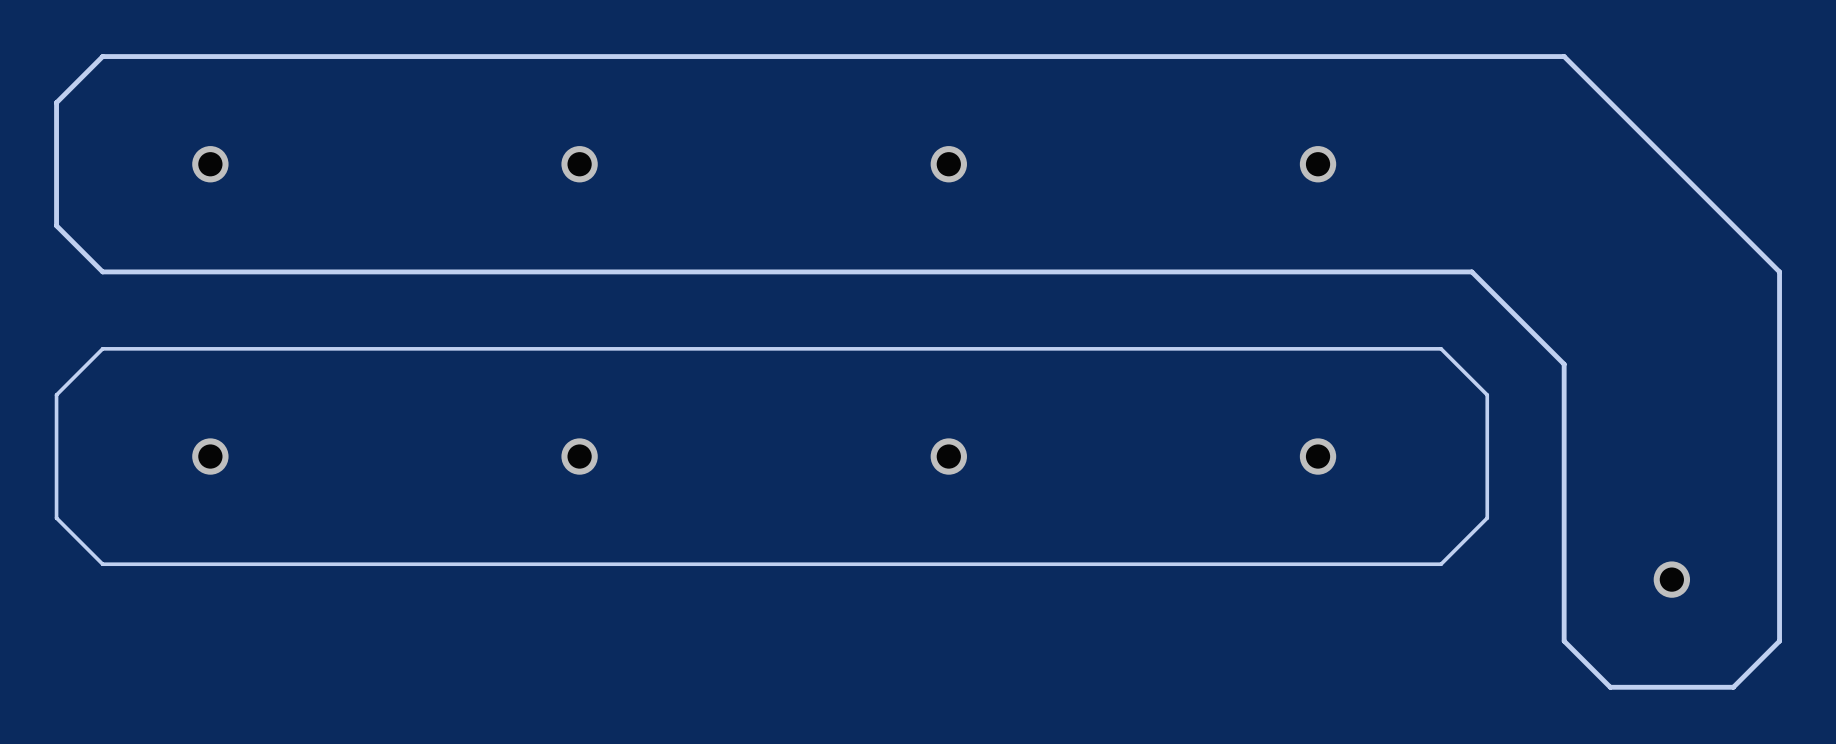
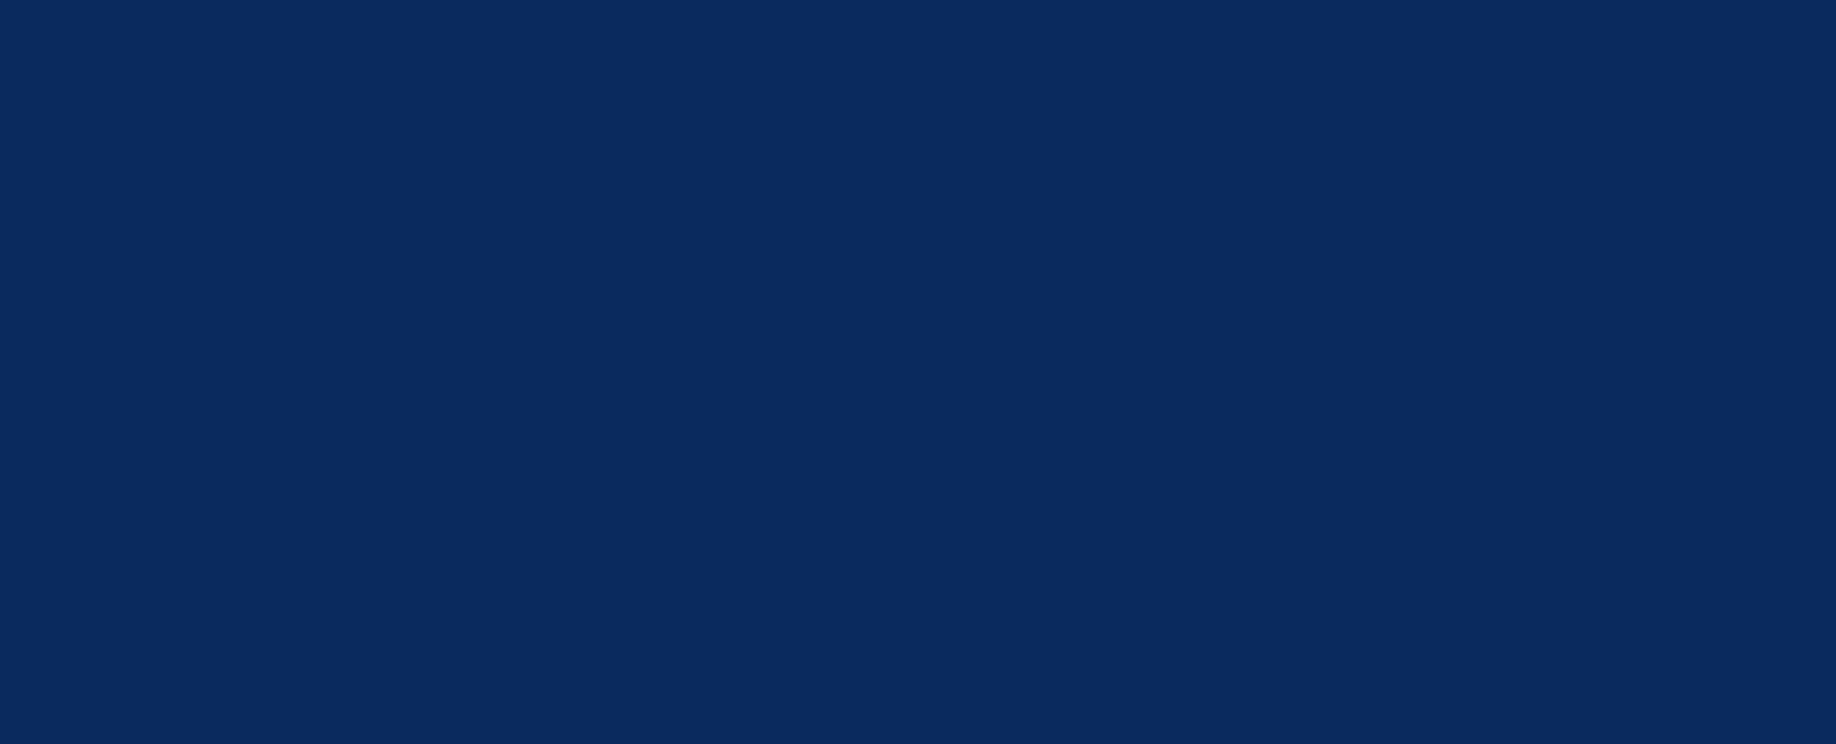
board edge: (102, 56) (56, 102) (56, 225) (102, 271) (1471, 271) (1564, 364) (1564, 641) (1610, 687) (1733, 687) (1779, 641) (1779, 271) (1564, 56) (102, 56) -> none
via: (210, 164) -> none
via: (579, 164) -> none
via: (948, 164) -> none
via: (1318, 164) -> none
board edge: (102, 348) (56, 394) (56, 518) (102, 564) (1441, 564) (1487, 518) (1487, 394) (1441, 348) (102, 348) -> none
via: (210, 456) -> none
via: (579, 456) -> none
via: (948, 456) -> none
via: (1318, 456) -> none
via: (1671, 579) -> none

